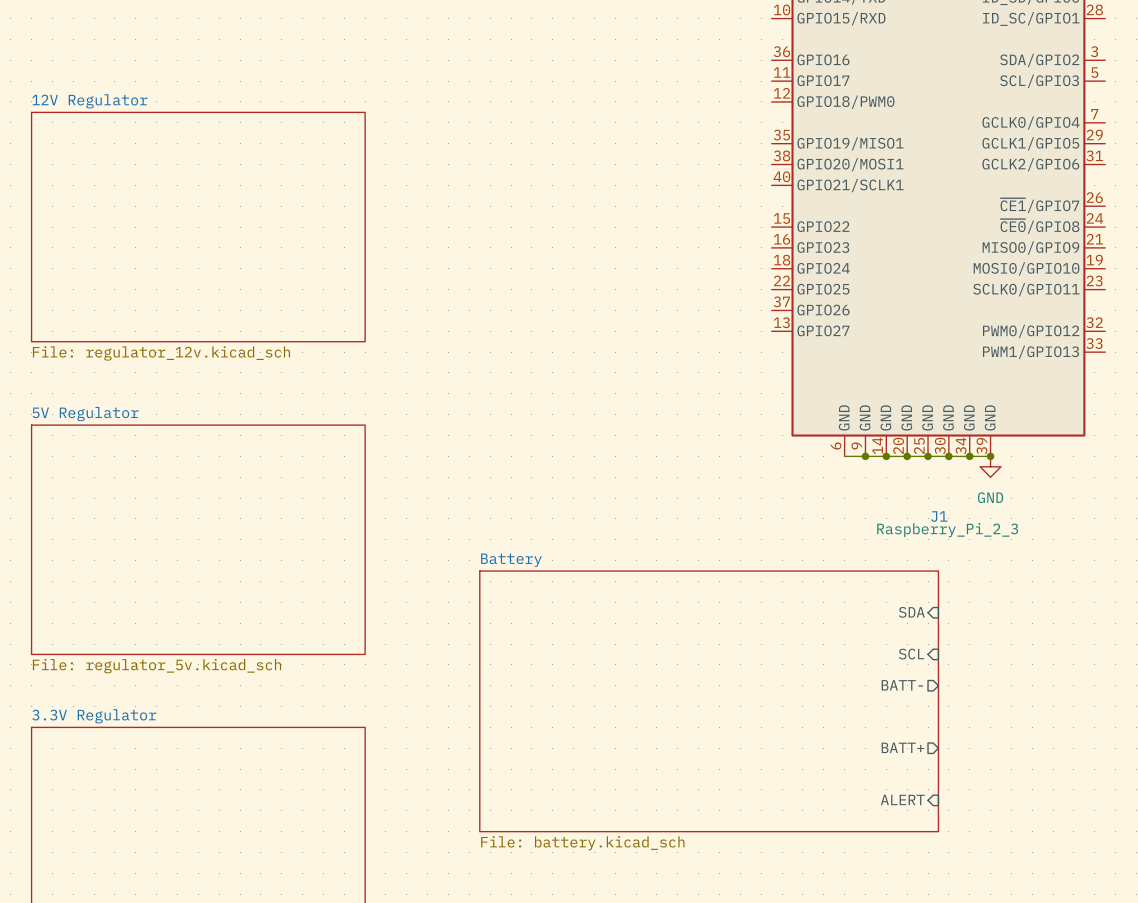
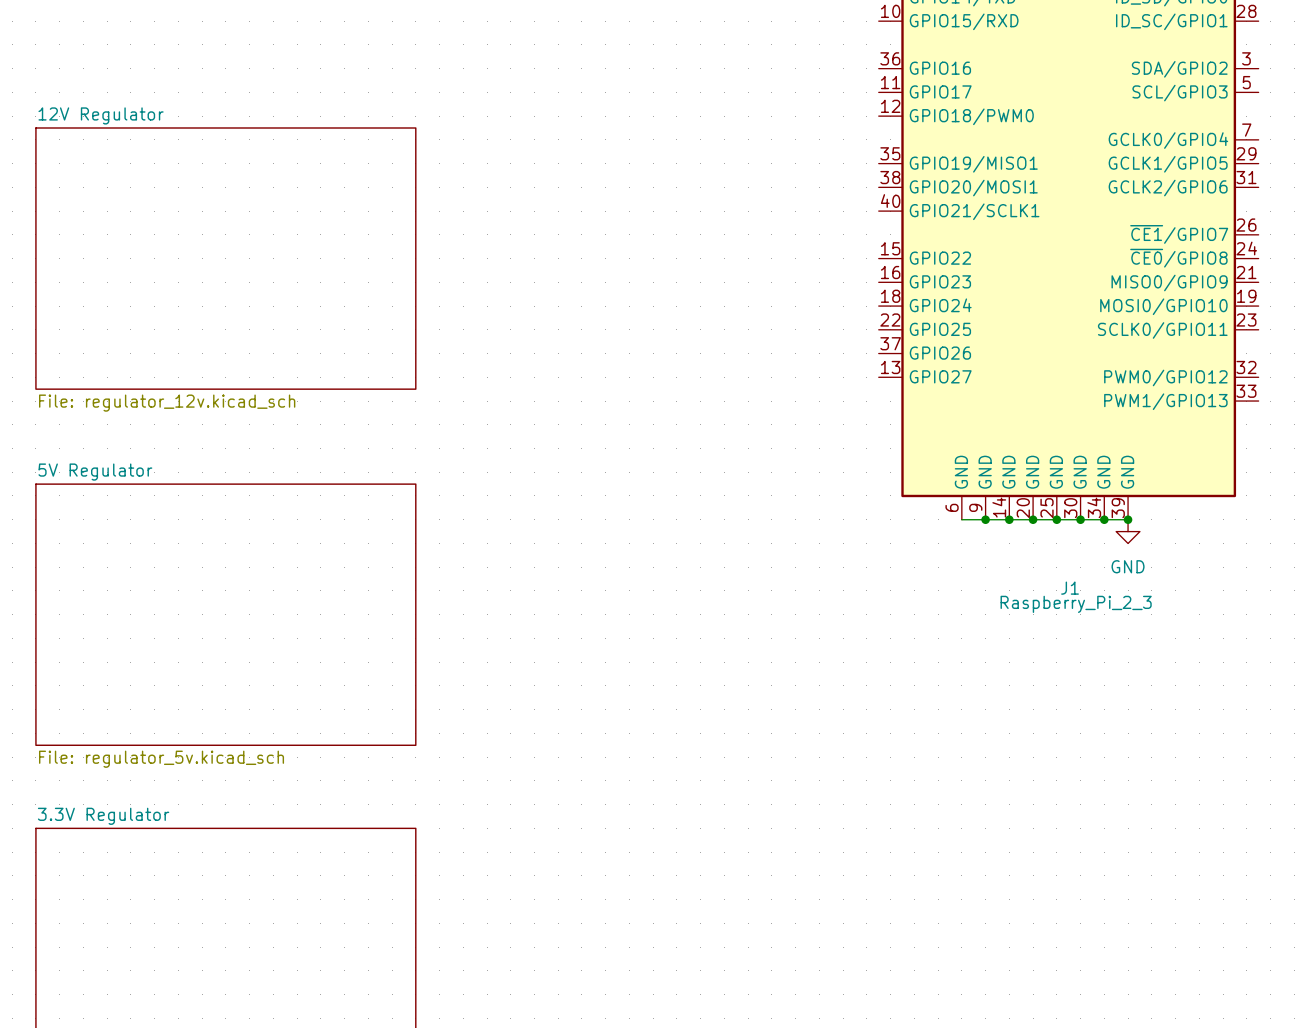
sheet pin: SDA (911, 612) -> none
sheet pin: SCL (911, 654) -> none
sheet pin: BATT- (902, 685) -> none
sheet Battery: File: battery.kicad_sch (709, 701) -> none
sheet pin: BATT+ (902, 747) -> none
sheet pin: ALERT (902, 799) -> none

